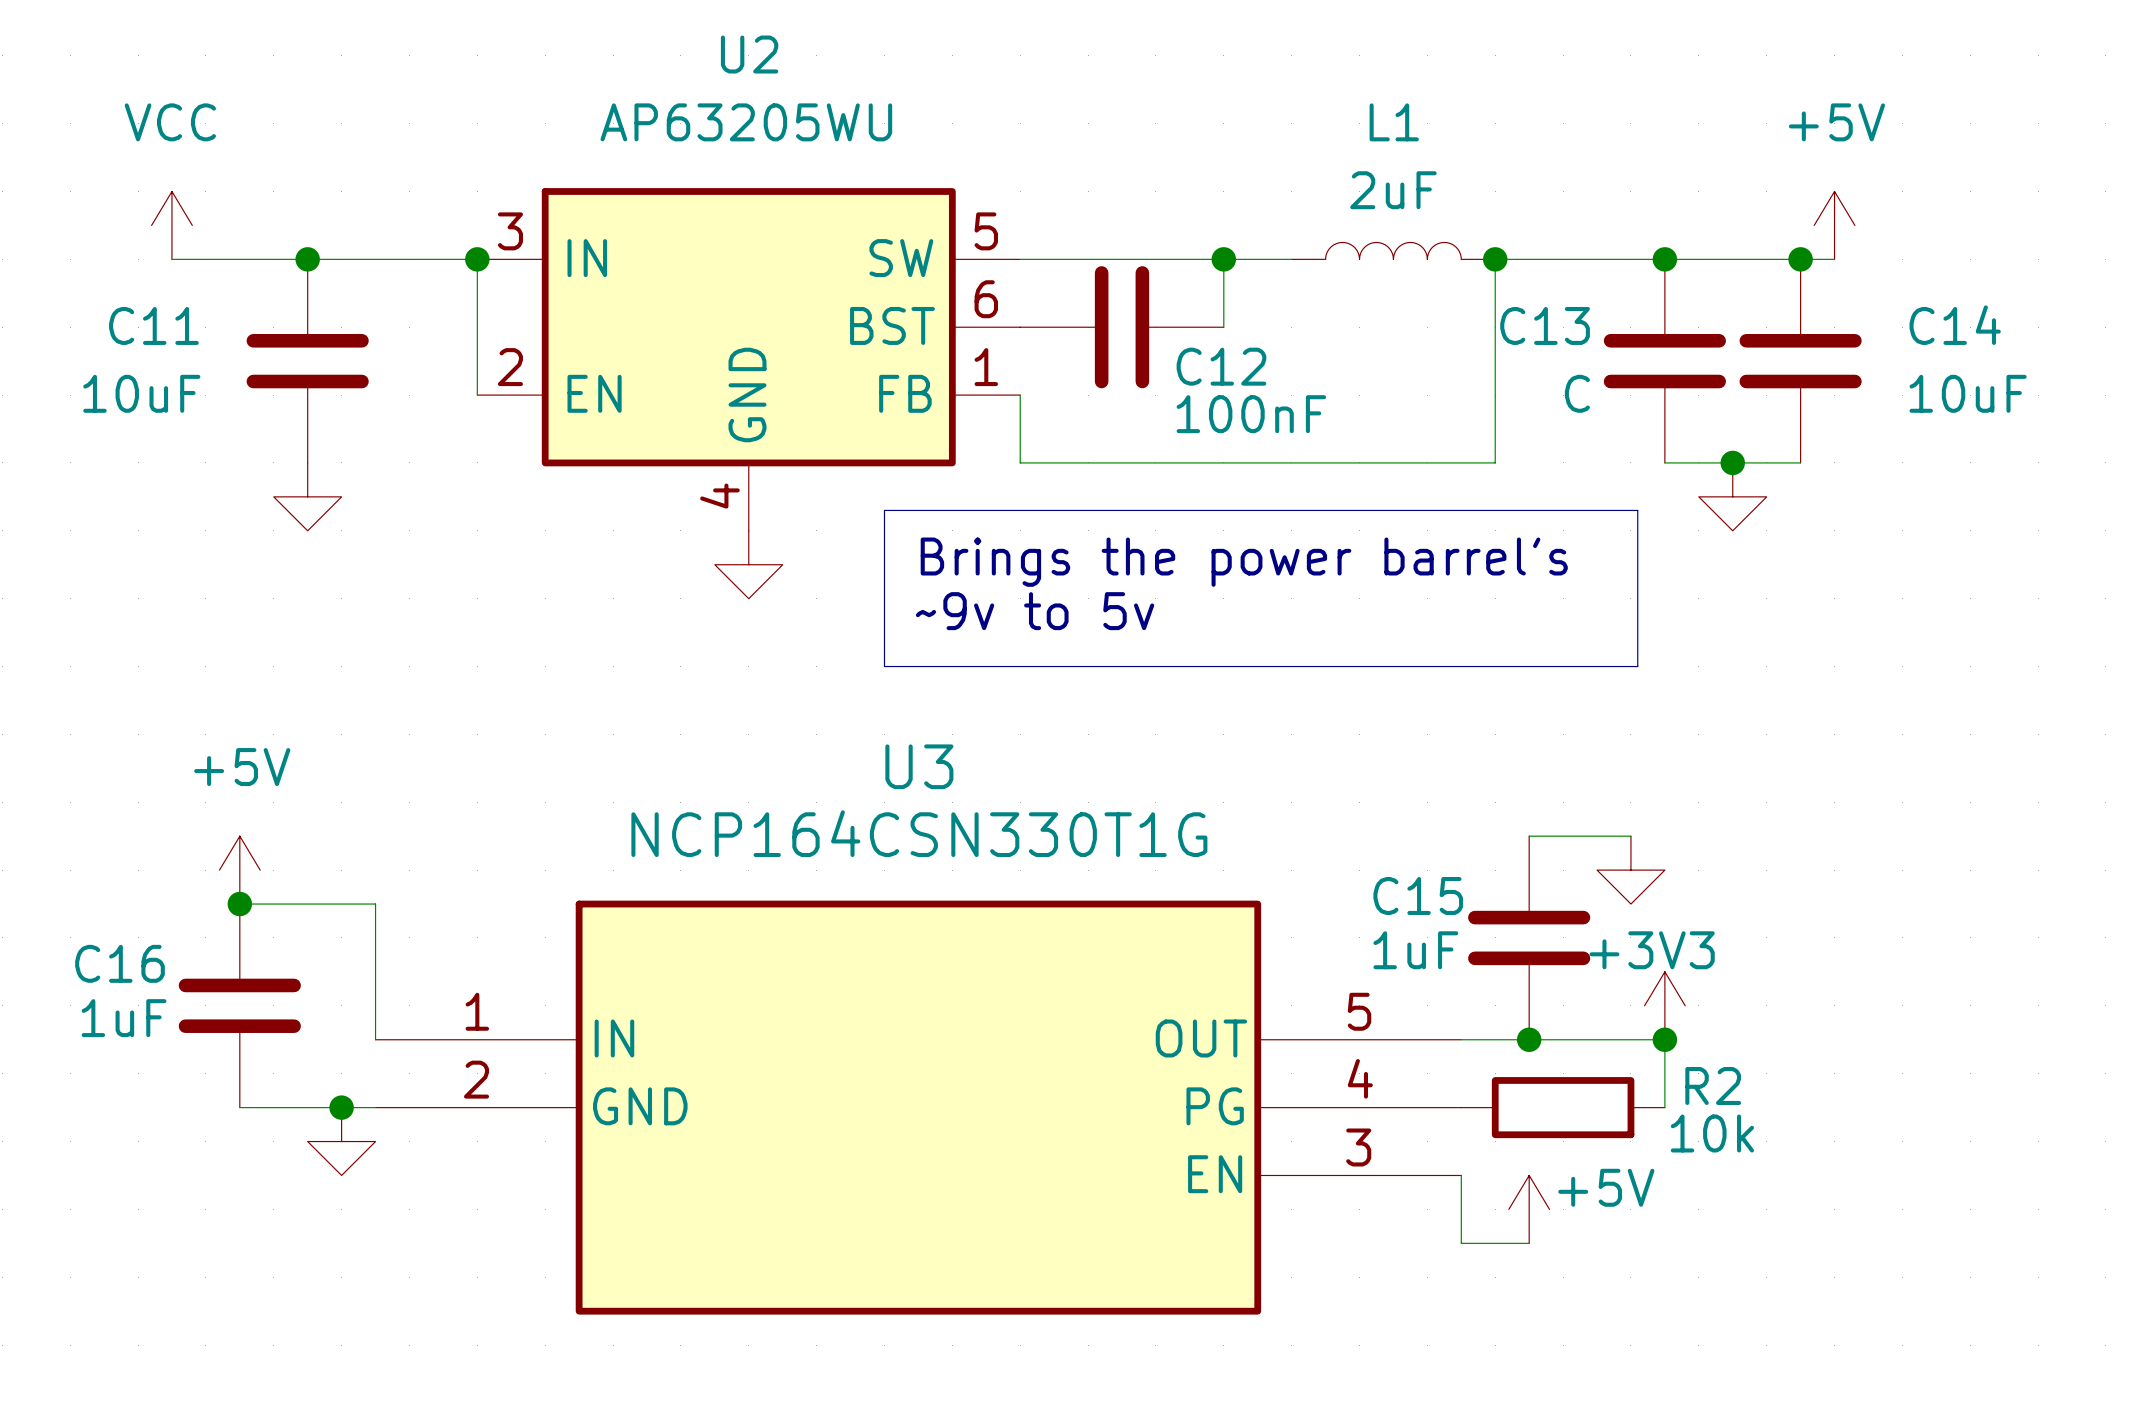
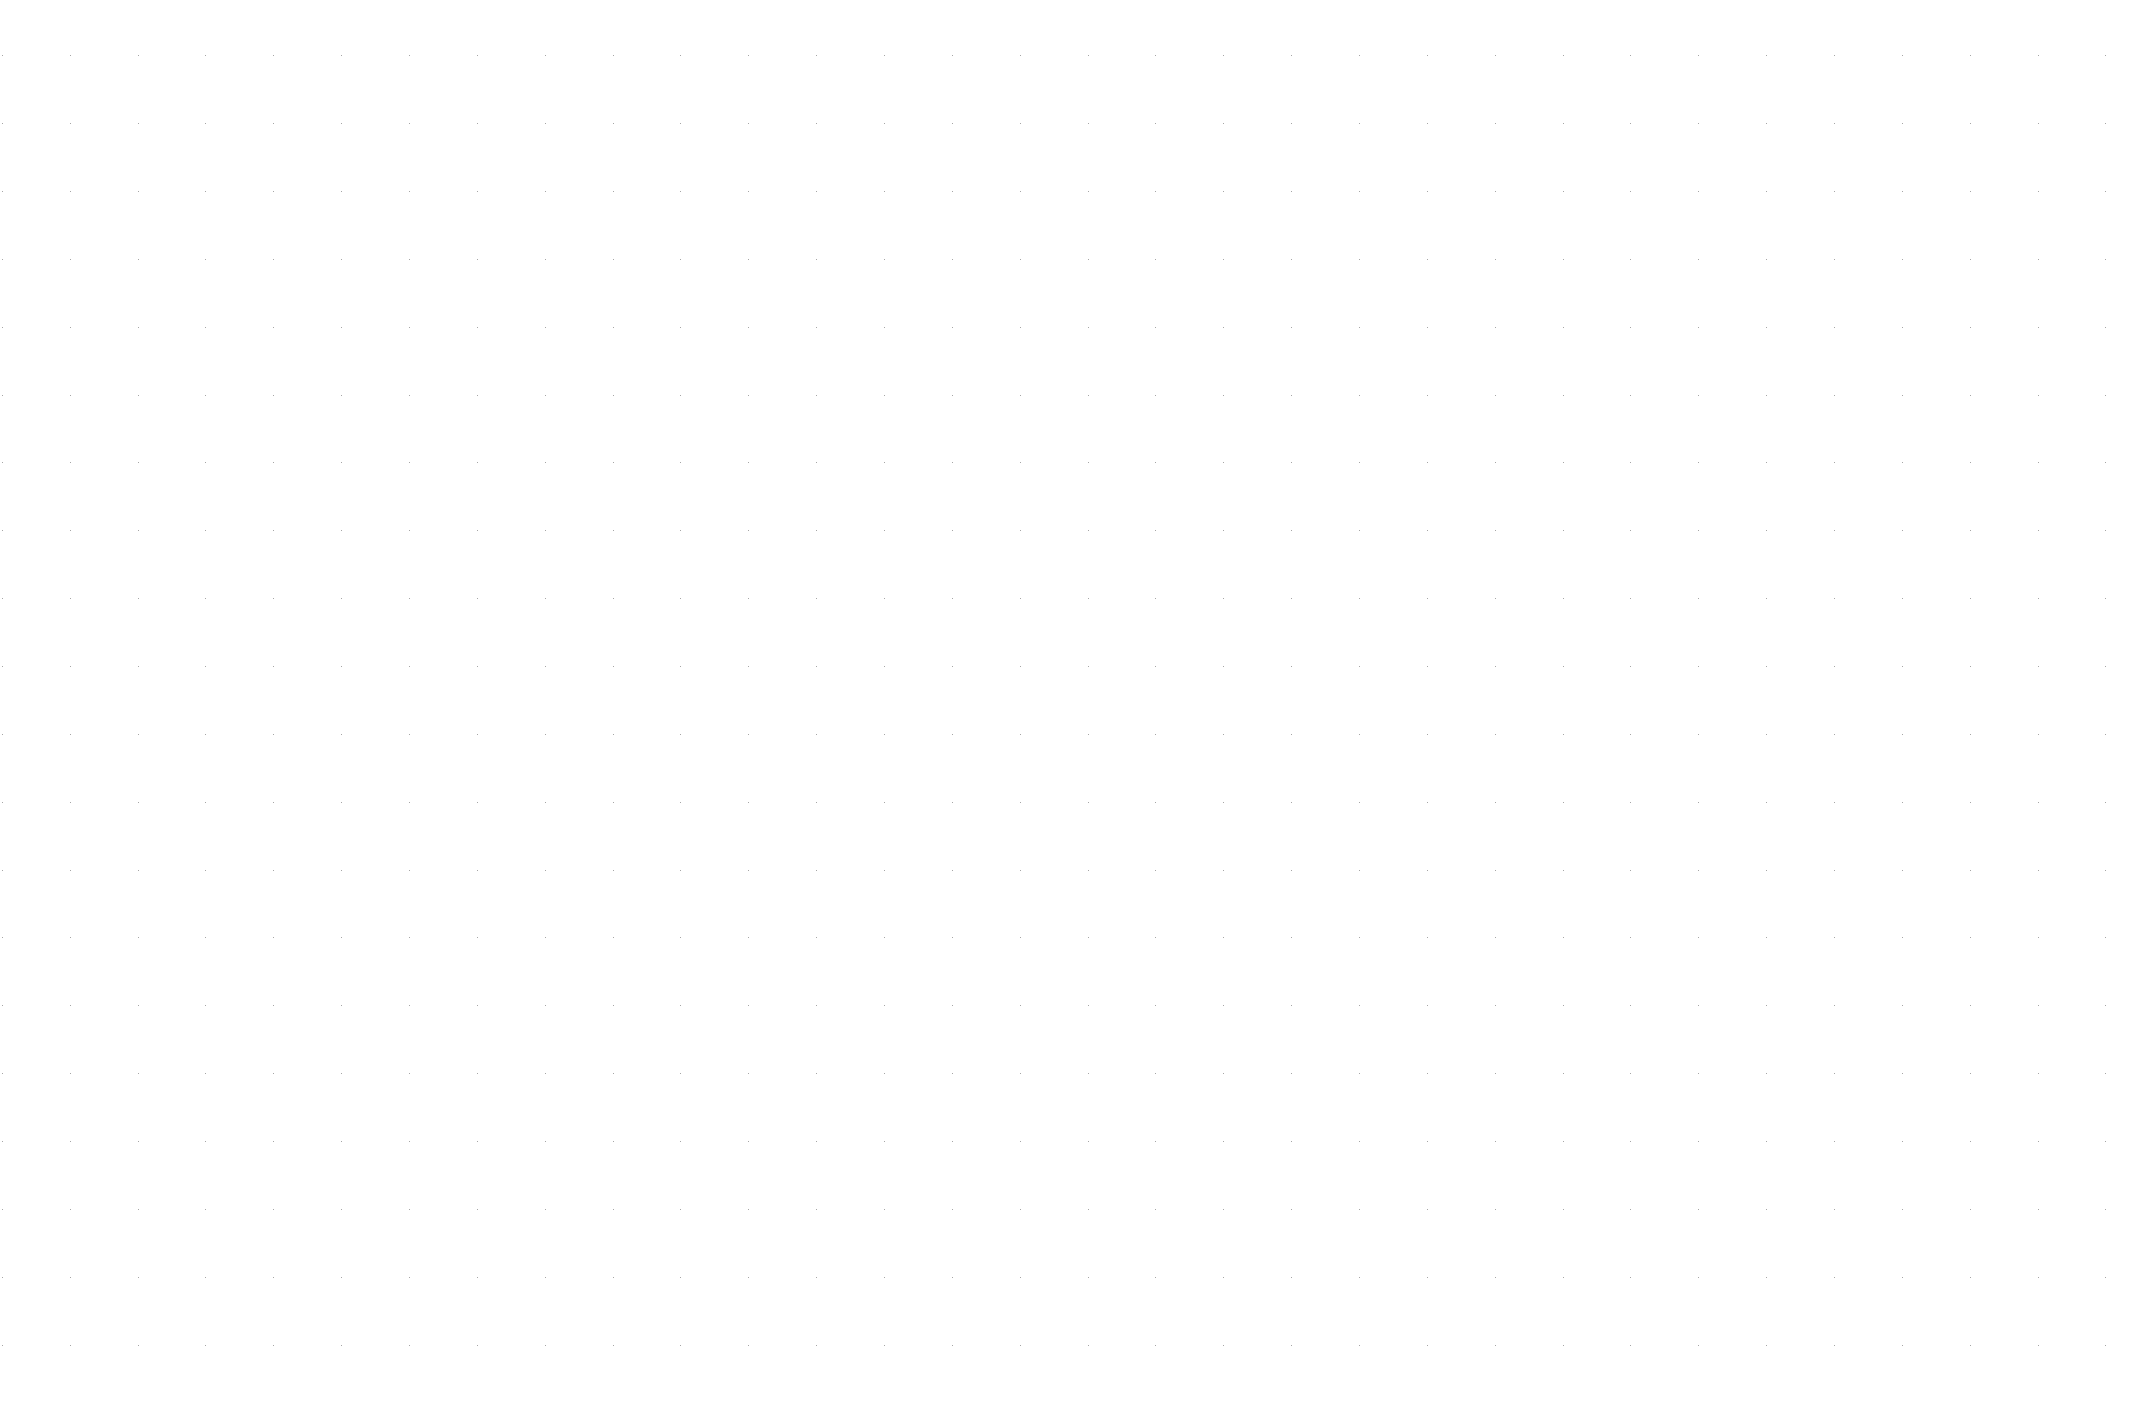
power symbol: VCC (171, 225) -> none
power symbol: +5V (1834, 225) -> none
L1: 2uF (1393, 250) -> none
wire: (171, 259) (477, 259) (477, 395) -> none
junction: (307, 259) -> none
junction: (477, 259) -> none
wire: (1020, 259) (1291, 259) -> none
wire: (1223, 259) (1223, 327) -> none
junction: (1223, 259) -> none
junction: (1495, 259) -> none
junction: (1664, 259) -> none
junction: (1800, 259) -> none
wire: (1834, 259) (1495, 259) (1495, 462) (1020, 462) (1020, 395) -> none
C12: 100nF (1122, 327) -> none
U2: AP63205WU (748, 359) -> none
C11: 10uF (307, 361) -> none
C13: C (1664, 361) -> none
C14: 10uF (1800, 361) -> none
wire: (1664, 462) (1800, 462) -> none
junction: (1732, 462) -> none
power symbol: (307, 496) -> none
power symbol: (1732, 496) -> none
line: (884, 510) (1637, 510) (1637, 666) (884, 666) (884, 510) -> none
text: Brings the power barrel's (1244, 562) -> none
power symbol: (748, 564) -> none
text: ~9v to 5v (1035, 611) -> none
wire: (1529, 836) (1630, 836) -> none
power symbol: +5V (239, 870) -> none
power symbol: (1630, 870) -> none
wire: (239, 904) (375, 904) (375, 1039) -> none
junction: (239, 904) -> none
C15: 1uF (1529, 937) -> none
C16: 1uF (239, 1005) -> none
power symbol: +3V3 (1664, 1005) -> none
wire: (1461, 1039) (1664, 1039) (1664, 1107) -> none
junction: (1529, 1039) -> none
junction: (1664, 1039) -> none
wire: (239, 1107) (375, 1107) -> none
junction: (341, 1107) -> none
U3: NCP164CSN330T1G (918, 1107) -> none
R2: 10k (1563, 1107) -> none
power symbol: (341, 1141) -> none
wire: (1461, 1175) (1461, 1243) (1529, 1243) -> none
power symbol: +5V (1529, 1209) -> none

